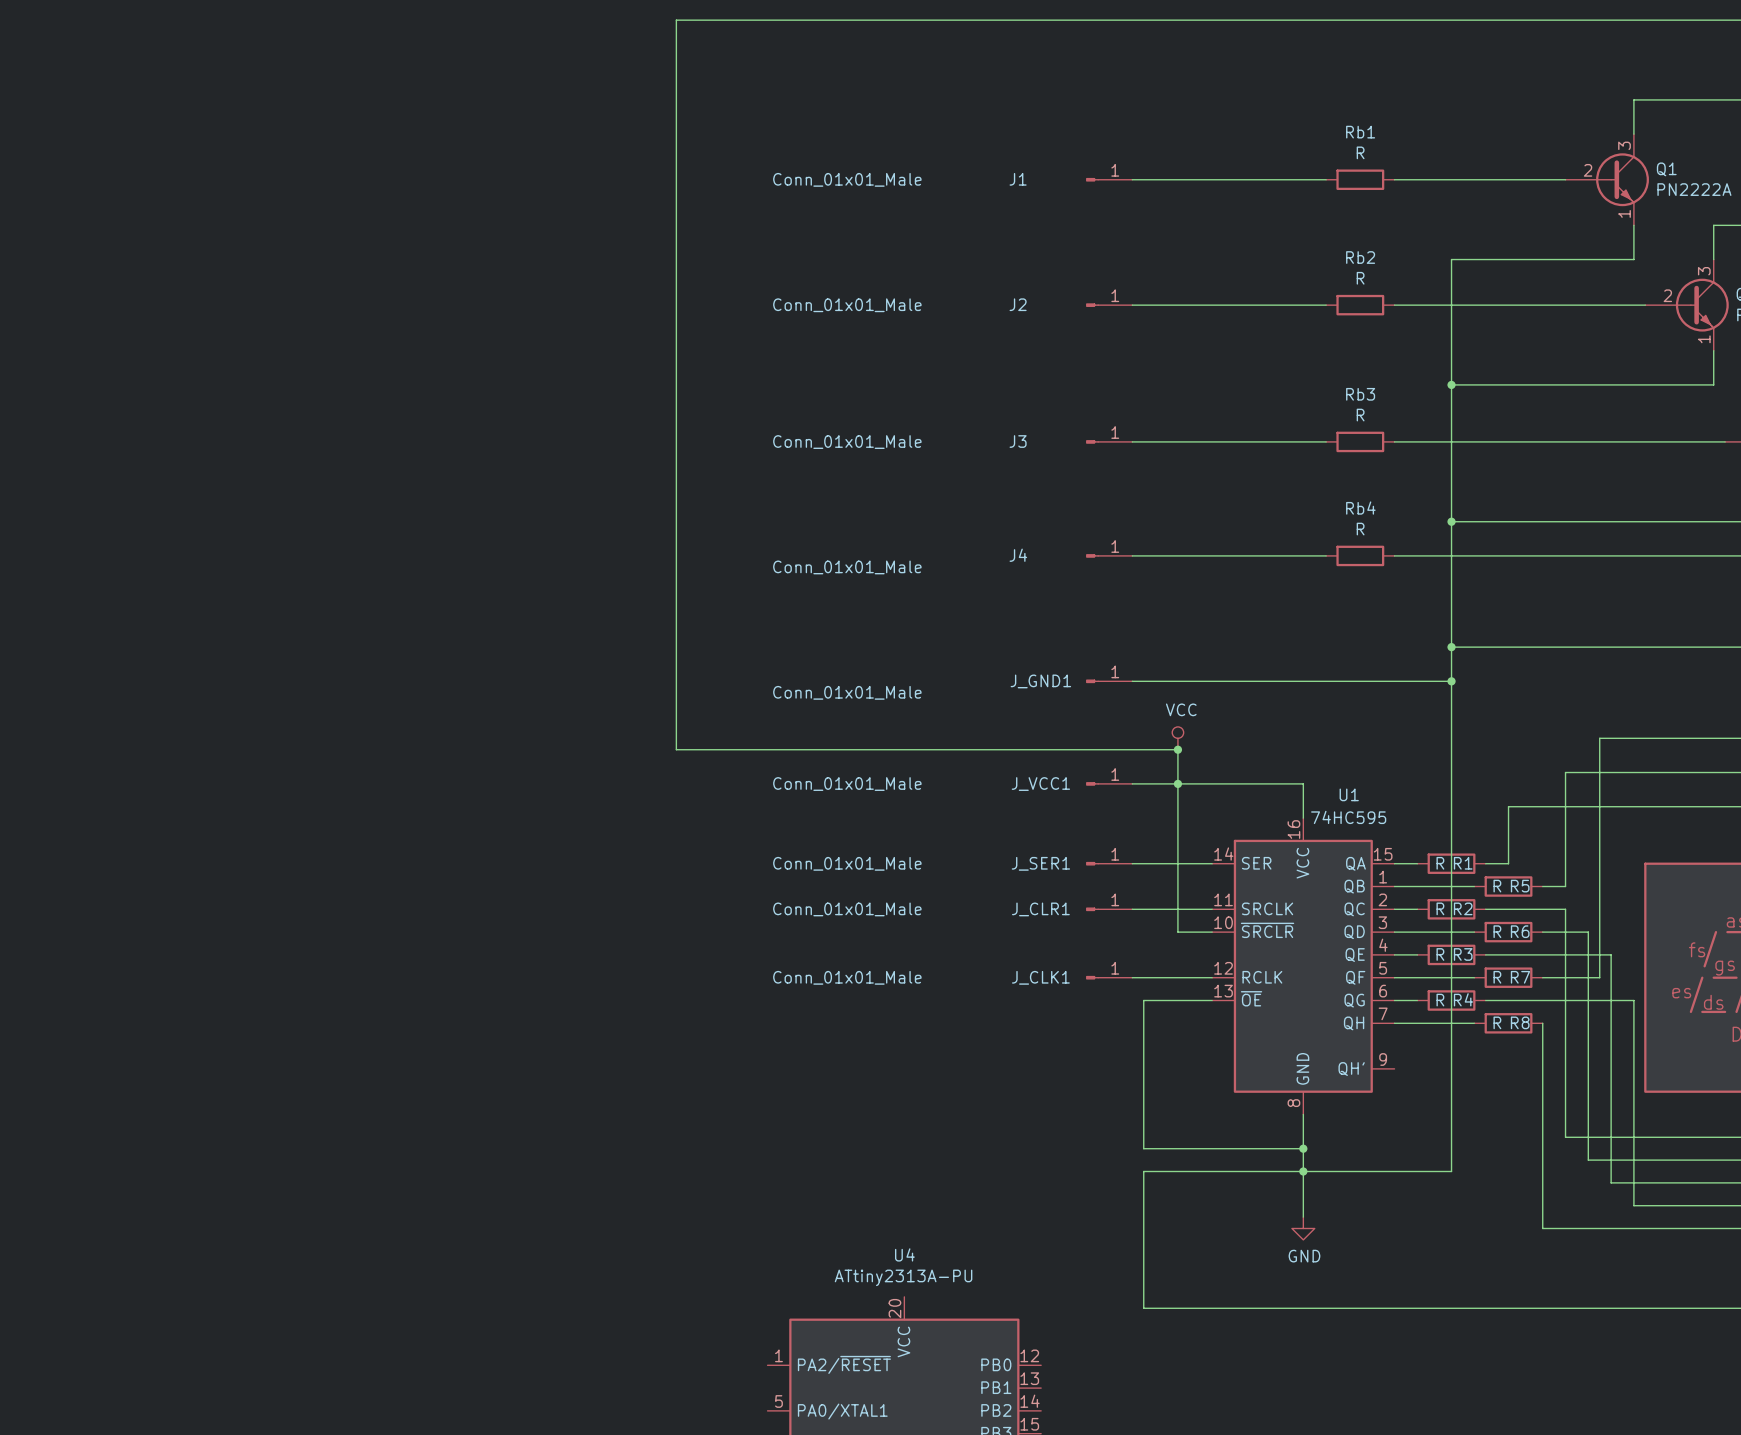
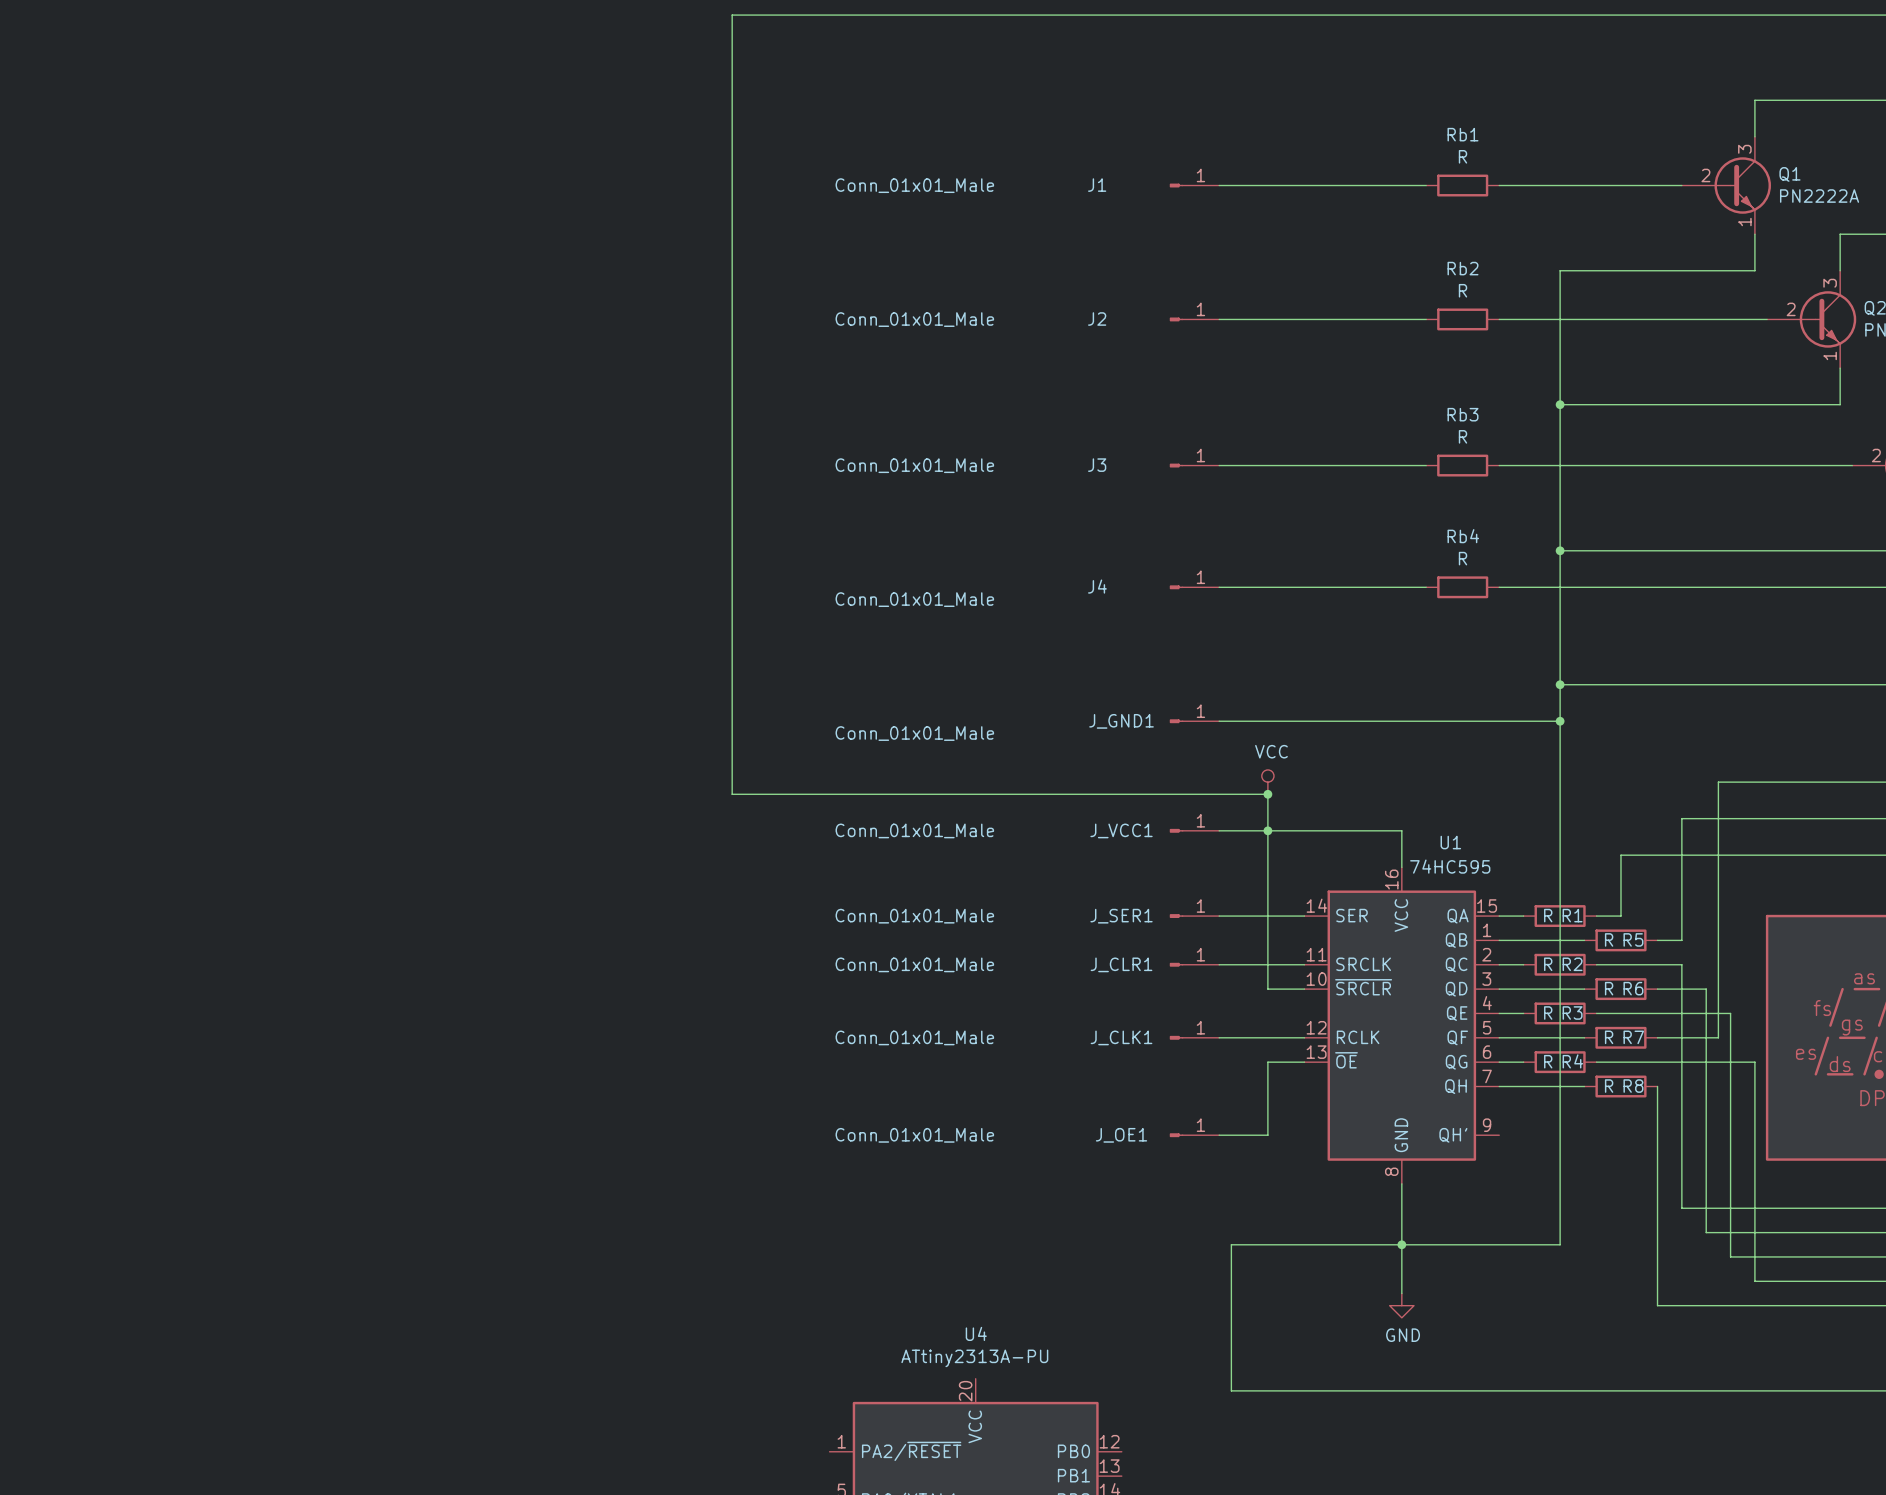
wire: (1177, 1000) (1143, 1000) (1143, 1148) (1303, 1148) -> (1267, 1062) (1267, 1135) (1219, 1135)
J_OE1: none -> Conn_01x01_Male (1194, 1135)
junction: (1303, 1148) -> none

